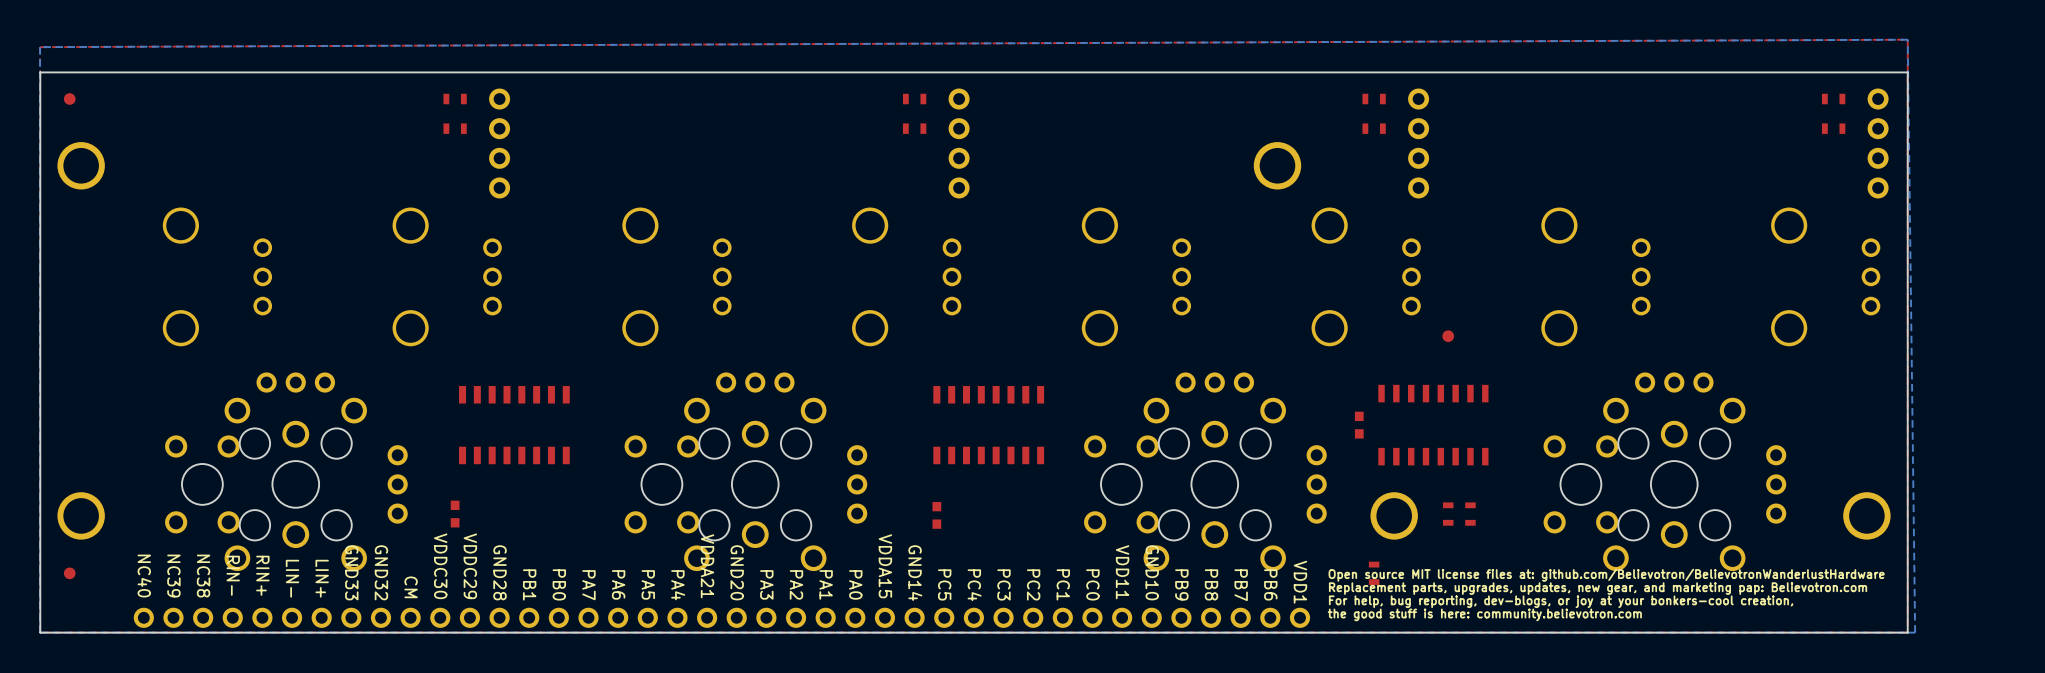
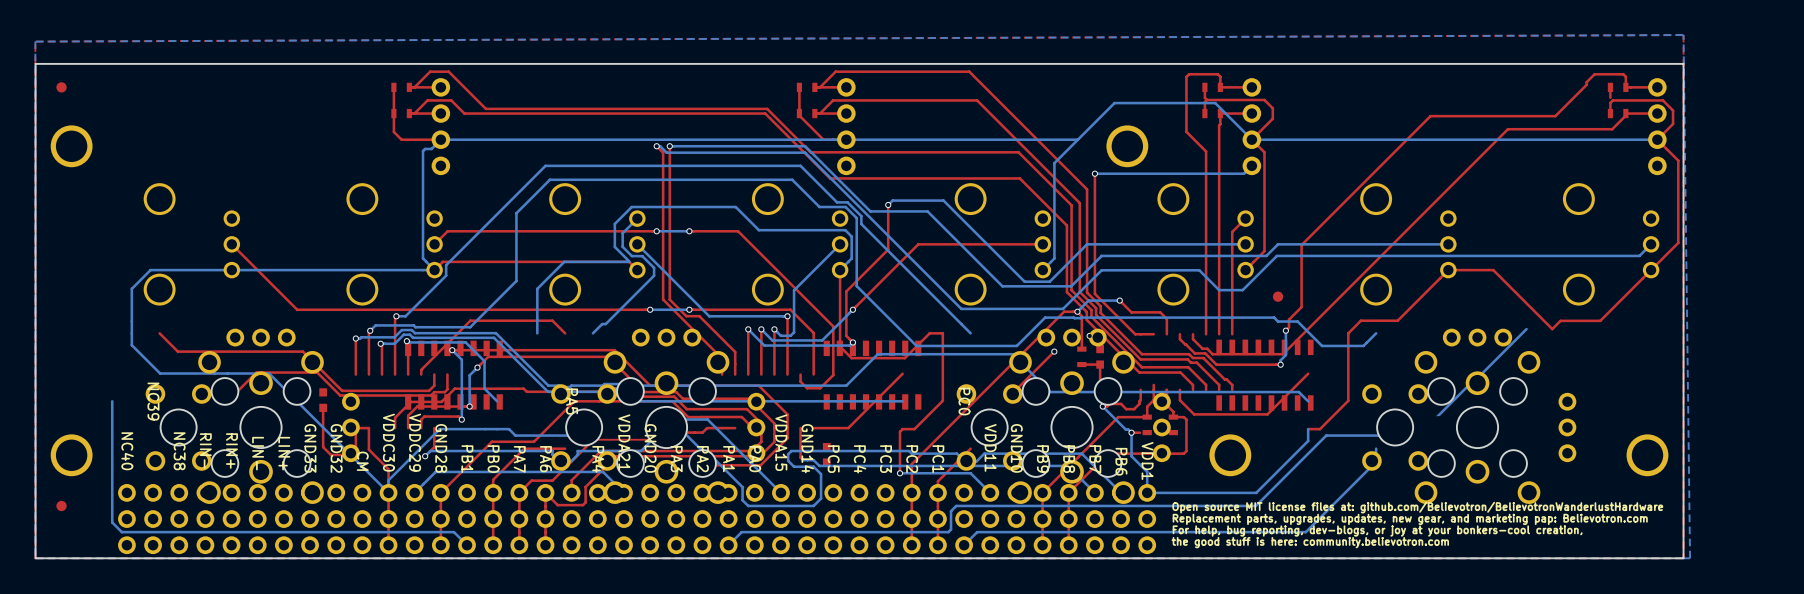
top track: none -> (393, 87) (393, 131) (401, 139) (440, 139)
top track: none -> (414, 87) (430, 71) (448, 71) (485, 108) (767, 108) (810, 152) (1018, 152) (1071, 205) (1071, 290) (1091, 310) (1091, 316) (1141, 367) (1188, 367) (1206, 384) (1206, 389)
top track: none -> (440, 87) (409, 87)
top track: none -> (799, 87) (799, 115) (823, 139) (846, 139)
top track: none -> (820, 87) (835, 71) (969, 71) (1087, 189) (1087, 292) (1100, 306) (1100, 312) (1141, 354) (1189, 354) (1192, 358) (1203, 358) (1232, 384) (1232, 389)
top track: none -> (846, 87) (814, 87)
top track: none -> (1204, 87) (1204, 97) (1206, 100)
top track: none -> (1251, 87) (1220, 87) (1220, 76) (1217, 74) (1189, 74) (1186, 76) (1186, 131) (1206, 151) (1206, 334)
top track: none -> (1610, 87) (1610, 97)
top track: none -> (1657, 87) (1625, 87) (1625, 76) (1623, 74) (1594, 74) (1555, 116) (1430, 116) (1301, 245) (1301, 307) (1288, 319) (1288, 327) (1285, 330)
top track: none -> (1206, 100) (1264, 100) (1272, 108) (1272, 118) (1251, 139) (1264, 152) (1264, 251) (1245, 270)
top track: none -> (1206, 100) (1204, 102) (1204, 113)
top track: none -> (414, 113) (427, 100) (451, 100) (464, 113) (765, 113) (830, 178) (1019, 178) (1066, 225) (1066, 292) (1086, 312) (1086, 319) (1139, 372) (1180, 372) (1193, 384) (1193, 389)
top track: none -> (440, 113) (409, 113)
top track: none -> (820, 113) (833, 100) (977, 100) (1079, 203) (1079, 291) (1096, 308) (1096, 314) (1140, 359) (1187, 359) (1191, 362) (1196, 362) (1219, 384) (1219, 389)
top track: none -> (846, 113) (814, 113)
top track: none -> (1251, 113) (1220, 113) (1219, 334)
top track: none -> (1610, 113) (1610, 102) (1612, 100) (1662, 100) (1673, 110) (1673, 124) (1657, 139) (1678, 160) (1678, 242) (1600, 320) (1560, 320) (1552, 329) (1493, 270) (1448, 270) (1397, 320) (1360, 320) (1348, 333) (1348, 400) (1320, 429) (1308, 429)
top track: none -> (1657, 113) (1625, 113) (1612, 129) (1507, 129) (1282, 354) (1212, 354) (1207, 348) (1202, 348) (1193, 339) (1193, 334)
bottom track: none -> (1077, 139) (440, 139) (431, 148) (425, 148) (423, 151) (423, 258) (434, 270) (150, 270) (131, 288) (131, 345) (160, 373) (269, 373) (388, 492) (388, 480) (439, 429) (509, 429) (515, 435) (645, 435) (661, 419) (707, 419) (780, 492)
bottom track: none -> (1657, 139) (1251, 139) (1215, 103) (1114, 103) (1054, 163) (1054, 258) (1042, 270)
bottom track: none -> (656, 146) (660, 146) (666, 152) (805, 152) (961, 308) (1063, 308) (1101, 270) (1199, 270) (1219, 290) (1242, 290) (1276, 255) (1639, 255) (1651, 244)
top track: none -> (656, 146) (663, 152) (663, 299) (722, 358) (722, 374)
via: none -> (656, 146)
bottom track: none -> (669, 146) (805, 146) (870, 211) (927, 211) (1002, 286) (1071, 286) (1101, 255) (1266, 255) (1278, 244) (1448, 244)
top track: none -> (669, 146) (669, 299) (686, 316) (699, 316) (735, 351) (735, 374)
via: none -> (669, 146)
bottom track: none -> (1251, 165) (1244, 173) (1094, 173)
top track: none -> (1094, 173) (1094, 293) (1135, 334) (1153, 334)
via: none -> (1094, 173)
bottom track: none -> (888, 205) (892, 200) (943, 200) (1024, 281) (1049, 281) (1087, 244) (1245, 244)
top track: none -> (888, 205) (888, 249) (846, 291) (846, 335) (852, 342)
via: none -> (888, 205)
bottom track: none -> (637, 218) (622, 233) (622, 246) (631, 256) (642, 256) (654, 267) (654, 275) (605, 324) (602, 324) (592, 333)
top track: none -> (1245, 218) (1232, 231) (1232, 334)
top track: none -> (656, 231) (447, 231) (434, 244)
via: none -> (656, 231)
bottom track: none -> (689, 231) (656, 231)
top track: none -> (689, 231) (738, 231) (833, 326) (833, 375) (820, 388) (807, 388) (800, 381) (800, 374)
via: none -> (689, 231)
top track: none -> (231, 244) (297, 309) (650, 309)
bottom track: none -> (637, 244) (709, 316) (787, 316)
bottom track: none -> (840, 244) (794, 290) (794, 332)
top track: none -> (1042, 244) (918, 244) (852, 309)
top track: none -> (637, 270) (629, 261) (442, 261) (434, 270)
bottom track: none -> (840, 270) (851, 258) (851, 236) (845, 230) (758, 230) (735, 207) (631, 207) (614, 223) (614, 246) (629, 261) (564, 261) (537, 288) (537, 333)
top track: none -> (840, 270) (840, 346) (851, 358) (904, 358) (929, 333) (942, 333) (942, 400) (914, 429) (902, 429) (900, 431) (900, 473)
bottom track: none -> (1119, 300) (1088, 300) (1077, 311)
top track: none -> (1119, 300) (1131, 312) (1160, 312) (1166, 318) (1166, 334)
via: none -> (1119, 300)
via: none -> (650, 309)
bottom track: none -> (689, 309) (650, 309)
top track: none -> (689, 309) (790, 309) (813, 332) (813, 374)
via: none -> (689, 309)
bottom track: none -> (852, 309) (822, 340) (772, 340) (761, 329)
via: none -> (852, 309)
via: none -> (1077, 311)
bottom track: none -> (396, 316) (405, 316) (446, 275) (446, 265) (545, 165) (800, 165) (837, 202) (847, 202) (861, 216) (861, 224) (970, 333)
top track: none -> (396, 316) (395, 374)
via: none -> (396, 316)
top track: none -> (787, 316) (787, 374)
via: none -> (787, 316)
bottom track: none -> (1526, 329) (1418, 435) (1326, 435) (1255, 505) (956, 505) (951, 511) (951, 529) (948, 532) (741, 532) (728, 545)
bottom track: none -> (748, 329) (764, 345) (849, 345) (852, 342)
top track: none -> (748, 329) (748, 374)
via: none -> (748, 329)
top track: none -> (761, 329) (761, 374)
via: none -> (761, 329)
bottom track: none -> (774, 329) (780, 335) (790, 335) (793, 332)
top track: none -> (774, 329) (774, 374)
via: none -> (774, 329)
bottom track: none -> (370, 330) (375, 325) (470, 327) (516, 280) (516, 213) (549, 179) (792, 179) (819, 207) (845, 207) (856, 218) (856, 286) (916, 345) (1016, 345) (1045, 317) (1274, 317) (1278, 321) (1297, 321) (1322, 345) (1363, 345) (1376, 333)
top track: none -> (370, 330) (368, 374)
via: none -> (370, 330)
bottom track: none -> (1285, 330) (1285, 355) (1280, 360) (1280, 364)
via: none -> (1285, 330)
top track: none -> (159, 333) (177, 351) (302, 351) (342, 390) (429, 390) (434, 385) (434, 374)
top track: none -> (565, 333) (552, 320) (470, 320) (421, 369) (421, 374)
top track: none -> (1179, 334) (1179, 339) (1194, 353) (1205, 353) (1216, 364) (1280, 364)
via: none -> (1089, 335)
bottom track: none -> (355, 338) (394, 337) (401, 330) (411, 330) (414, 333) (495, 333) (548, 385) (560, 387) (604, 384) (846, 385) (877, 354) (1012, 354) (1050, 392) (1298, 392) (1308, 401)
top track: none -> (355, 338) (355, 374)
via: none -> (355, 338)
bottom track: none -> (406, 341) (465, 342) (484, 361) (484, 388) (497, 401)
top track: none -> (406, 341) (408, 374)
via: none -> (406, 341)
via: none -> (852, 342)
bottom track: none -> (380, 343) (394, 343) (403, 334) (409, 334) (413, 337) (494, 337) (547, 391) (603, 391) (606, 388) (618, 388) (631, 401) (902, 401)
top track: none -> (380, 343) (382, 374)
via: none -> (380, 343)
top track: none -> (1081, 349) (1081, 316) (1077, 311) (1064, 311) (911, 464) (911, 545)
bottom track: none -> (452, 350) (461, 359) (461, 419)
top track: none -> (452, 350) (614, 350) (650, 385) (758, 385) (787, 414) (787, 438) (760, 465) (697, 465)
via: none -> (452, 350)
top track: none -> (1054, 351) (1018, 387) (1018, 401)
via: none -> (1054, 351)
part: none -> (1081, 356)
top track: none -> (1081, 364) (1100, 364) (1100, 379) (1102, 381) (1102, 406) (1107, 406) (1109, 403) (1121, 403) (1126, 409) (1134, 409) (1140, 400) (1140, 389)
via: none -> (1280, 364)
bottom track: none -> (477, 367) (469, 375) (469, 406)
top track: none -> (477, 367) (488, 356) (608, 356) (643, 392) (676, 392) (682, 398) (749, 398) (774, 423) (774, 441) (760, 456) (616, 456) (585, 487) (585, 502) (582, 505) (557, 505) (545, 492) (545, 545)
via: none -> (477, 367)
top track: none -> (902, 373) (848, 428) (813, 428)
top track: none -> (1308, 373) (1267, 414) (1194, 414) (1179, 400) (1179, 389)
top track: none -> (447, 374) (447, 389) (444, 392) (434, 392) (431, 395) (340, 395) (317, 372) (256, 372) (227, 401)
part position: (1359, 425) -> (1100, 356)
top track: none -> (1153, 384) (1153, 400) (1147, 406) (1147, 417) (1118, 417) (1042, 492) (1042, 545)
top track: none -> (1166, 389) (1166, 405) (1173, 411) (1173, 417) (1183, 417) (1186, 419) (1186, 451) (1183, 453) (1107, 453) (1068, 492) (1068, 545)
bottom track: none -> (112, 401) (112, 522) (121, 532) (453, 532) (467, 545)
top track: none -> (469, 406) (417, 406) (408, 415) (408, 428)
via: none -> (469, 406)
bottom track: none -> (1102, 406) (1125, 429) (1131, 432) (1131, 456) (1147, 471) (1147, 492) (1256, 492) (1308, 440) (1308, 429)
via: none -> (1102, 406)
top track: none -> (323, 407) (323, 447) (330, 454) (346, 454) (355, 445) (355, 428) (368, 428) (368, 449) (388, 469) (388, 545)
top track: none -> (701, 417) (741, 417) (748, 423) (748, 428)
top track: none -> (701, 417) (688, 417) (672, 401) (574, 401) (534, 441) (492, 441) (440, 492) (440, 545)
top track: none -> (461, 419) (458, 416) (424, 416) (421, 419) (421, 428)
via: none -> (461, 419)
top track: none -> (666, 419) (679, 432) (702, 432) (707, 428) (735, 428)
part: none -> (1147, 424)
part: none -> (1173, 424)
top track: none -> (395, 428) (395, 417) (410, 401) (441, 401) (454, 388) (523, 388) (526, 391) (603, 391) (606, 388) (618, 388) (626, 396) (674, 396) (686, 409) (747, 409) (761, 423) (761, 441) (752, 451) (600, 451) (571, 480) (571, 492)
top track: none -> (434, 428) (434, 447) (425, 456)
top track: none -> (800, 428) (800, 457) (803, 460)
via: none -> (1131, 432)
top track: none -> (1139, 432) (1131, 432)
top track: none -> (668, 439) (593, 439) (552, 480) (531, 480) (519, 492) (519, 545)
top track: none -> (565, 448) (524, 448) (493, 479) (493, 545)
top track: none -> (970, 448) (937, 481) (937, 545)
bottom track: none -> (1376, 448) (1376, 461) (1305, 532) (977, 532) (964, 545)
part position: (455, 514) -> (323, 400)
part: (1448, 514) -> none
part: (1470, 514) -> none
bottom track: none -> (425, 456) (430, 451) (552, 451) (552, 454) (559, 461) (571, 461) (577, 454) (577, 451) (641, 451) (659, 432) (684, 432) (702, 451) (706, 451) (742, 487) (742, 500) (748, 505) (813, 505) (821, 498) (821, 474) (813, 466) (794, 466) (788, 460) (788, 454) (791, 451) (909, 451) (911, 453) (956, 453) (964, 461) (976, 461) (984, 453) (1081, 453) (1121, 492)
via: none -> (425, 456)
bottom track: none -> (803, 460) (813, 460) (819, 465) (1067, 465) (1094, 492)
bottom track: none -> (900, 473) (970, 473) (990, 492)
via: none -> (900, 473)
bottom track: none -> (624, 492) (603, 471) (435, 471) (414, 492)
part: (1374, 573) -> none
part: none -> (637, 519)
part: (721, 617) -> none

